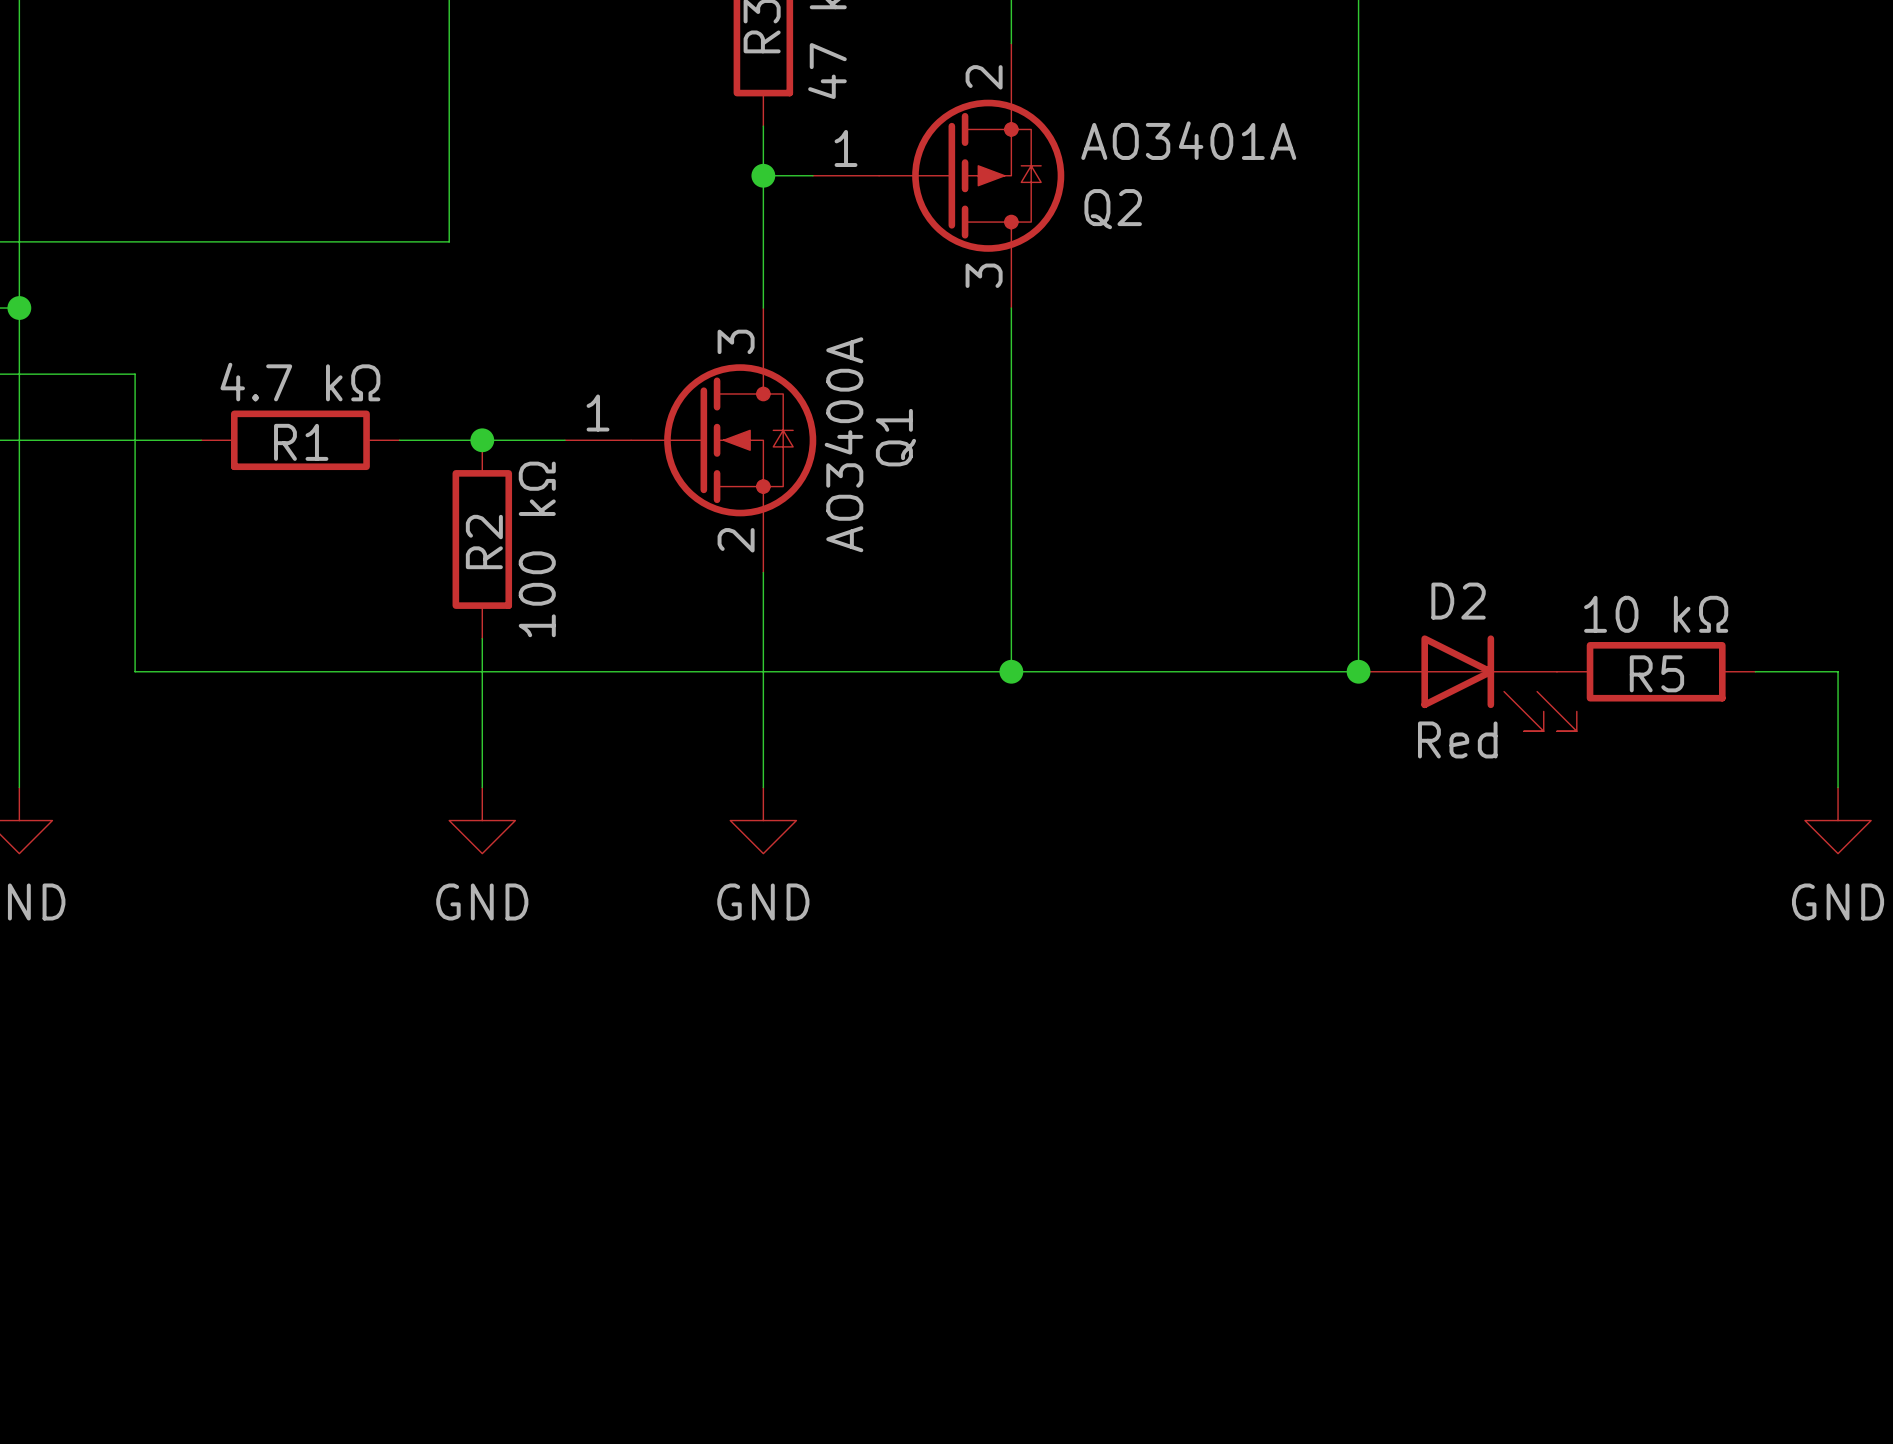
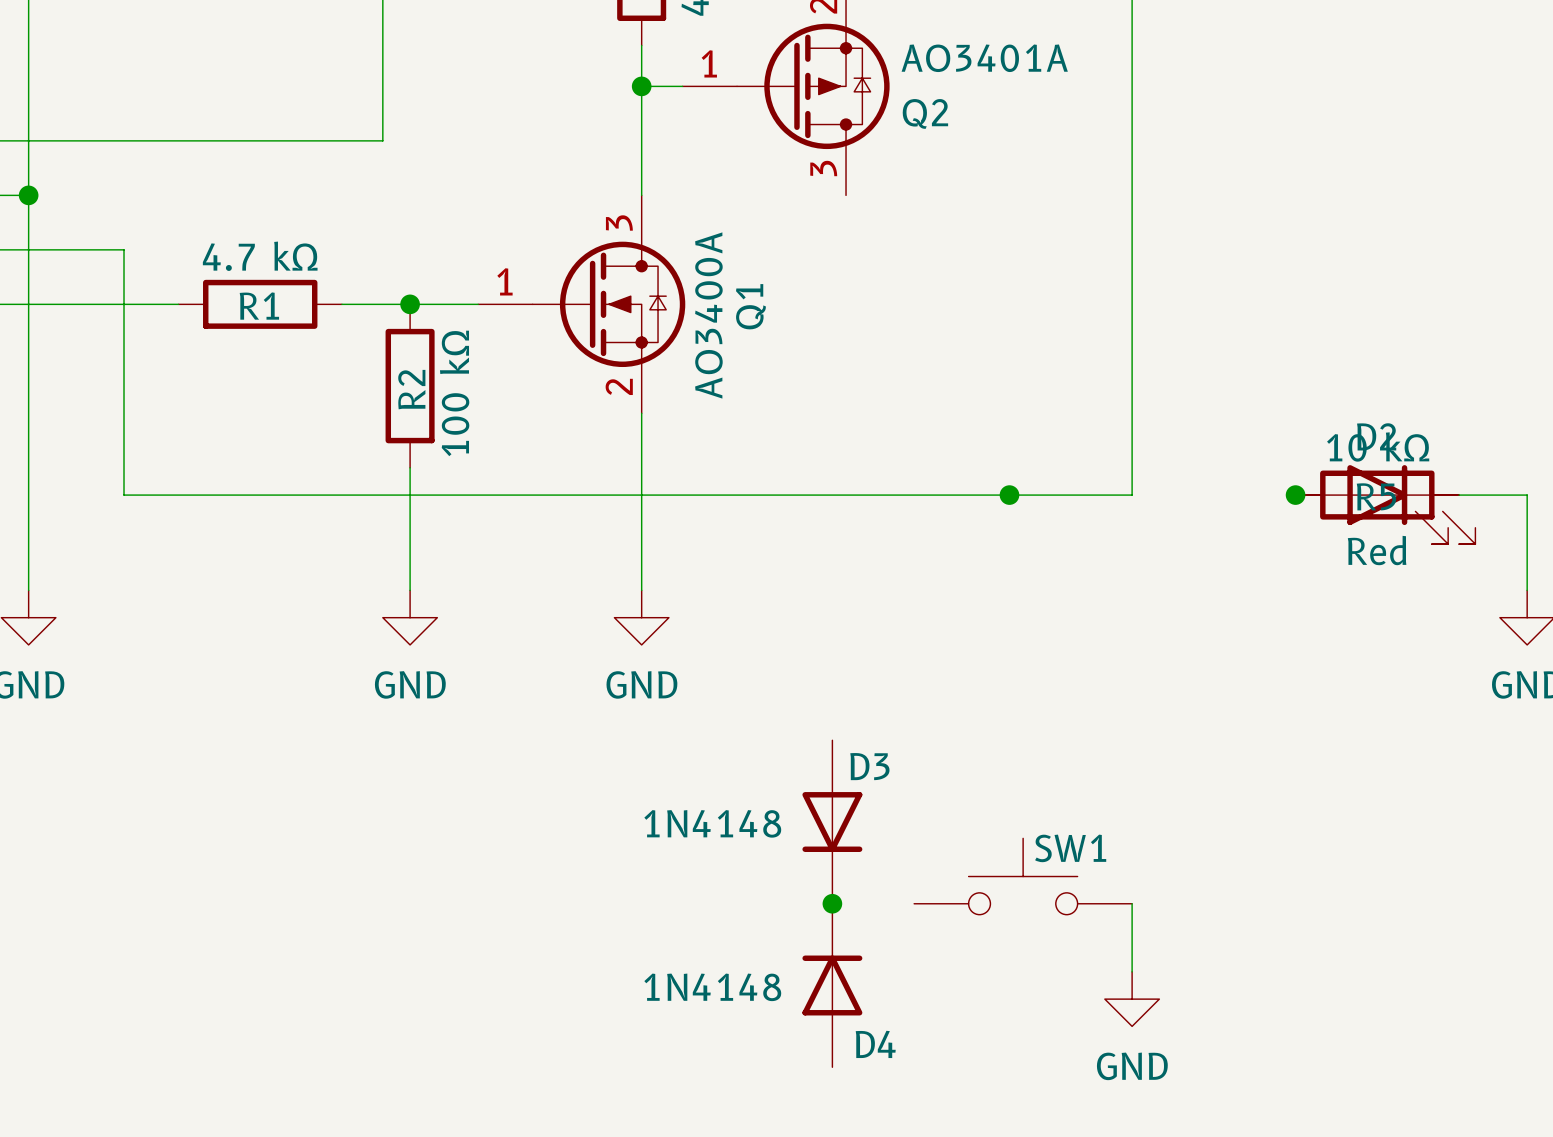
wire: (1011, 308) (1011, 671) -> none
junction: (1011, 671) -> none
junction: none -> (1009, 495)
junction: (1358, 671) -> none
junction: none -> (1295, 495)
D2 position: (1467, 683) -> (1385, 504)
D3: none -> 1N4148 (832, 822)
SW1: none -> (1023, 876)
junction: none -> (832, 903)
wire: none -> (1132, 903) (1132, 971)
D4: none -> 1N4148 (832, 985)
power symbol: none -> GND (1132, 999)

